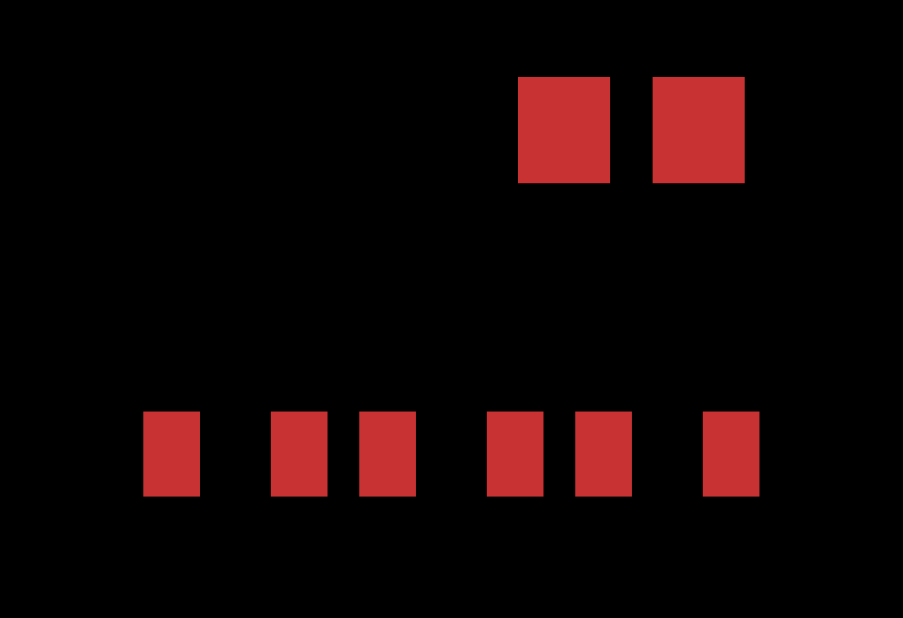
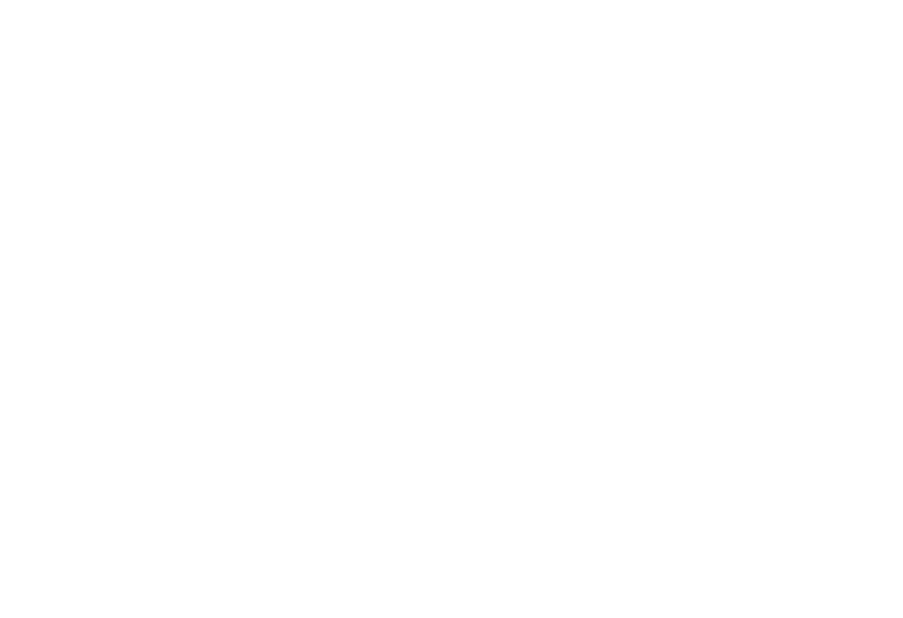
part: (631, 130) -> none
part: (235, 454) -> none
part: (451, 454) -> none
part: (667, 454) -> none

